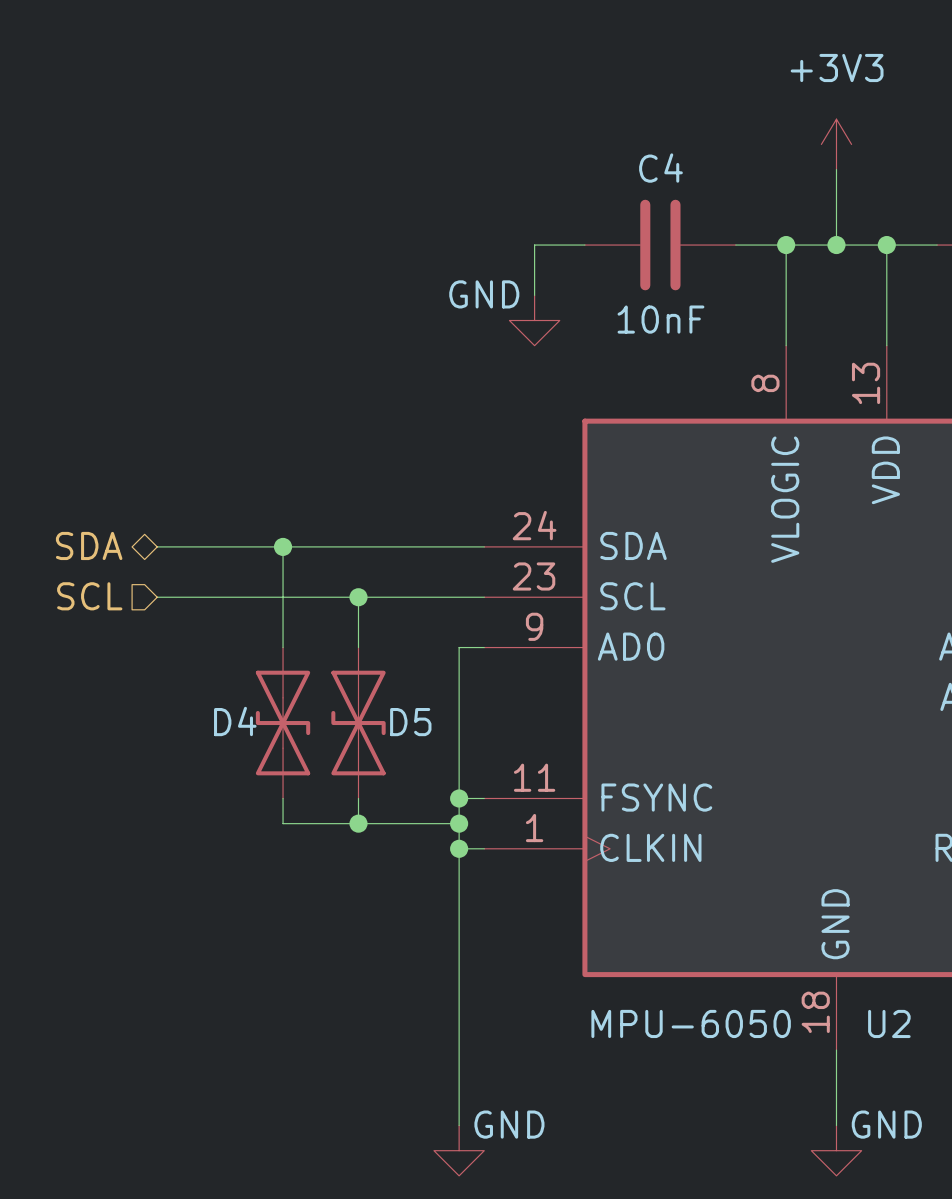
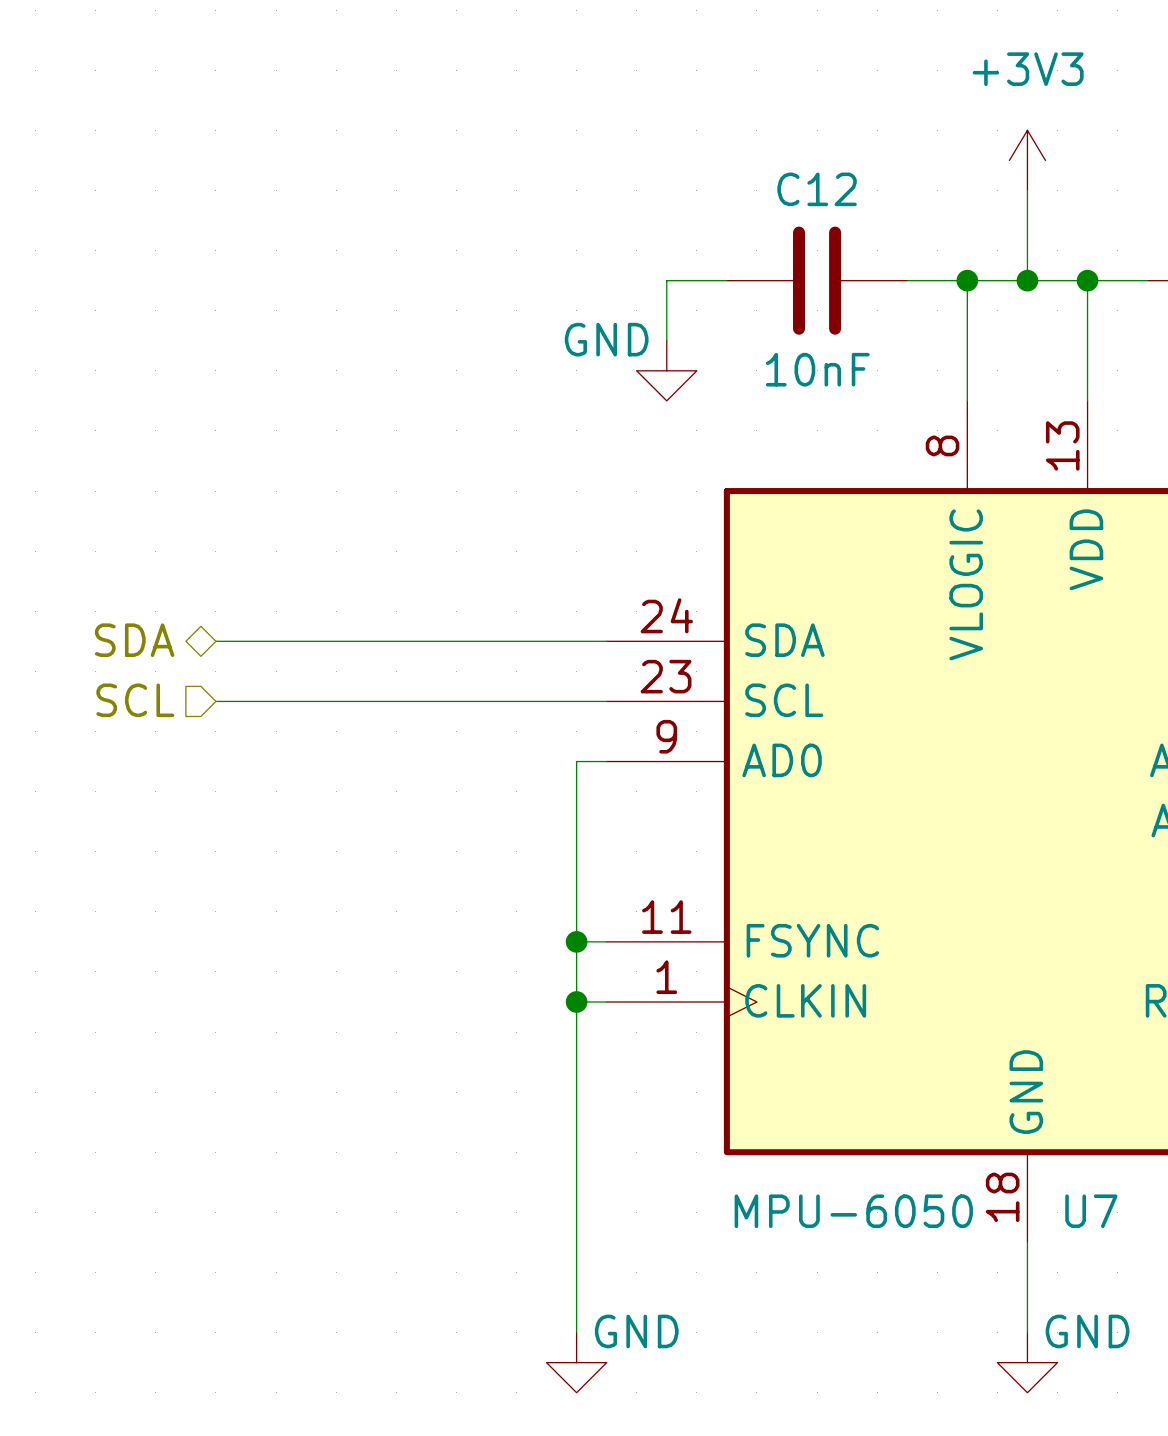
C4 name: C4 (660, 168) -> C12 (817, 189)
wire: (283, 546) (283, 647) -> none
junction: (283, 546) -> none
wire: (358, 597) (358, 647) -> none
junction: (358, 597) -> none
D4: (283, 723) -> none
D5: (358, 723) -> none
wire: (283, 798) (283, 823) (459, 823) -> none
wire: (358, 798) (358, 823) -> none
junction: (358, 823) -> none
junction: (459, 823) -> none
U2 name: U2 (889, 1023) -> U7 (1091, 1211)

